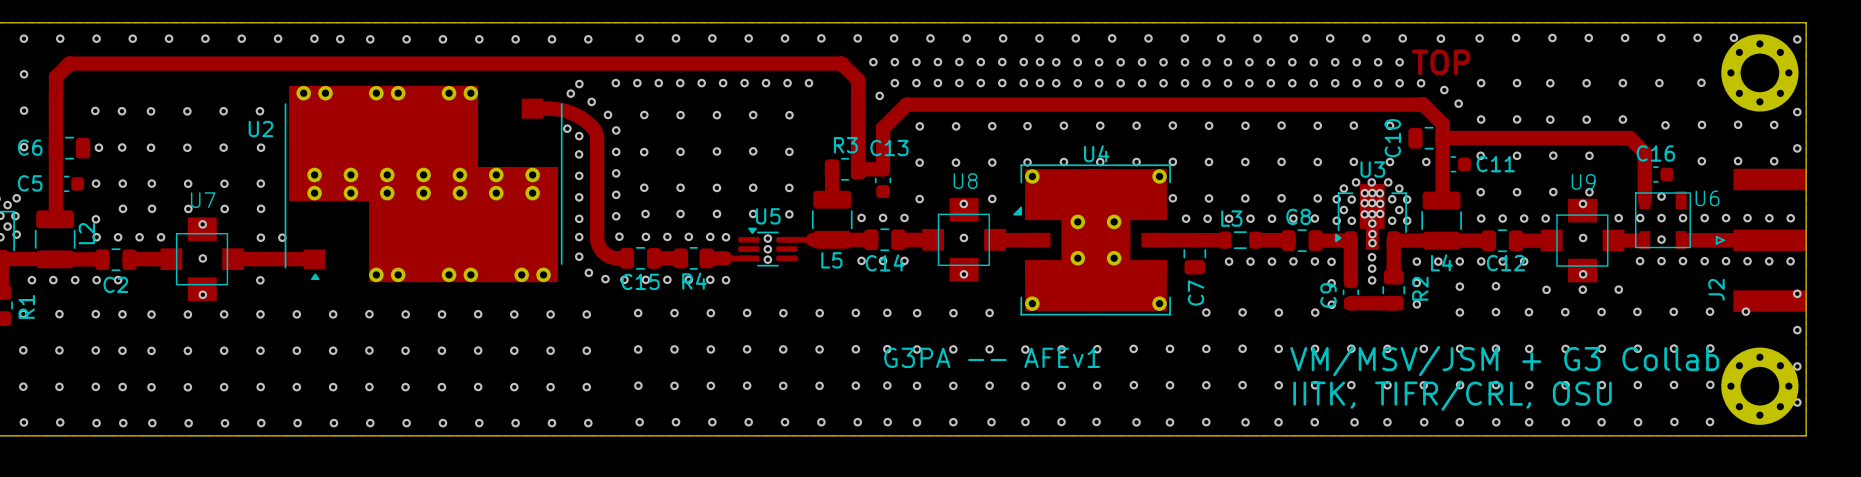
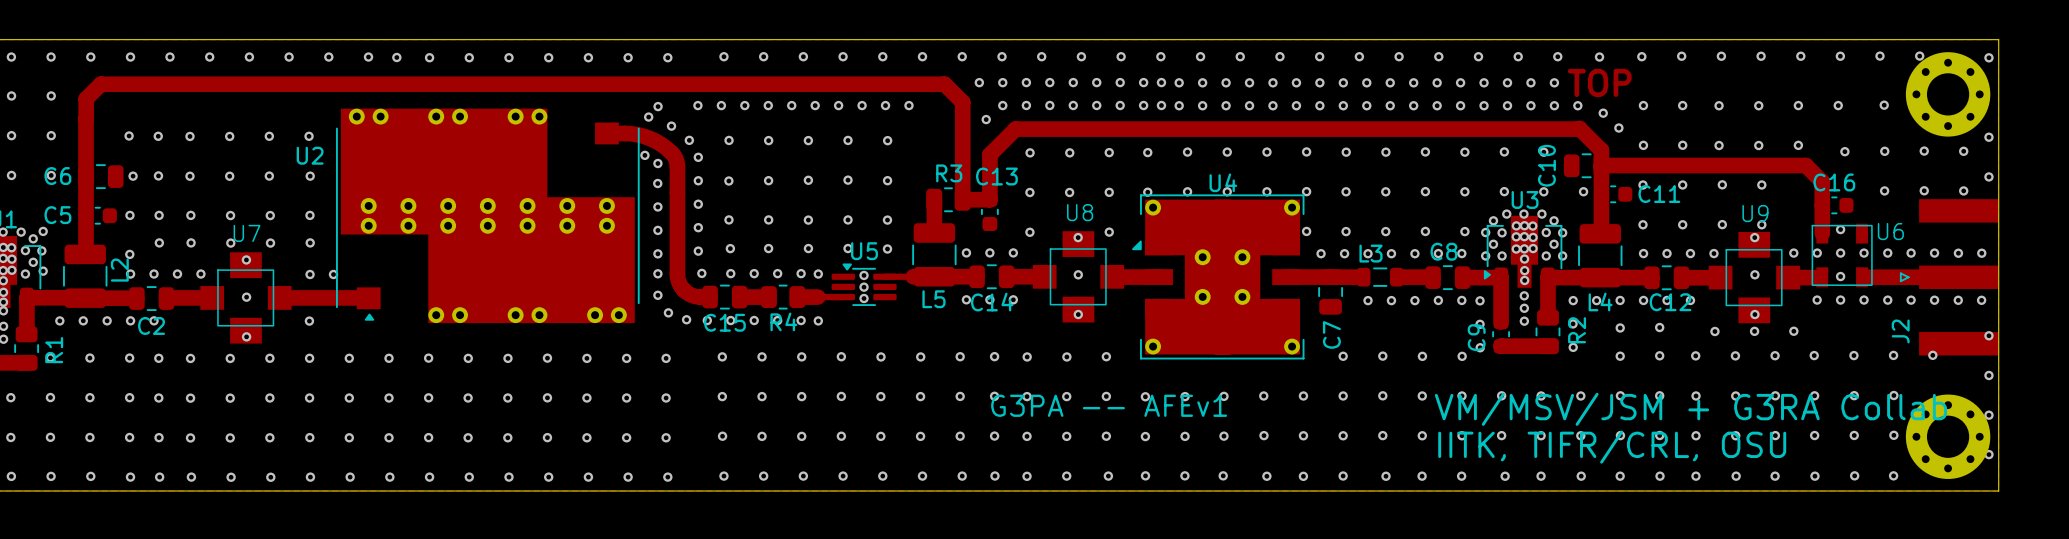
text: VM/MSV/JSM + G3 Collab (1504, 361) -> VM/MSV/JSM + G3RA Collab (1690, 409)

